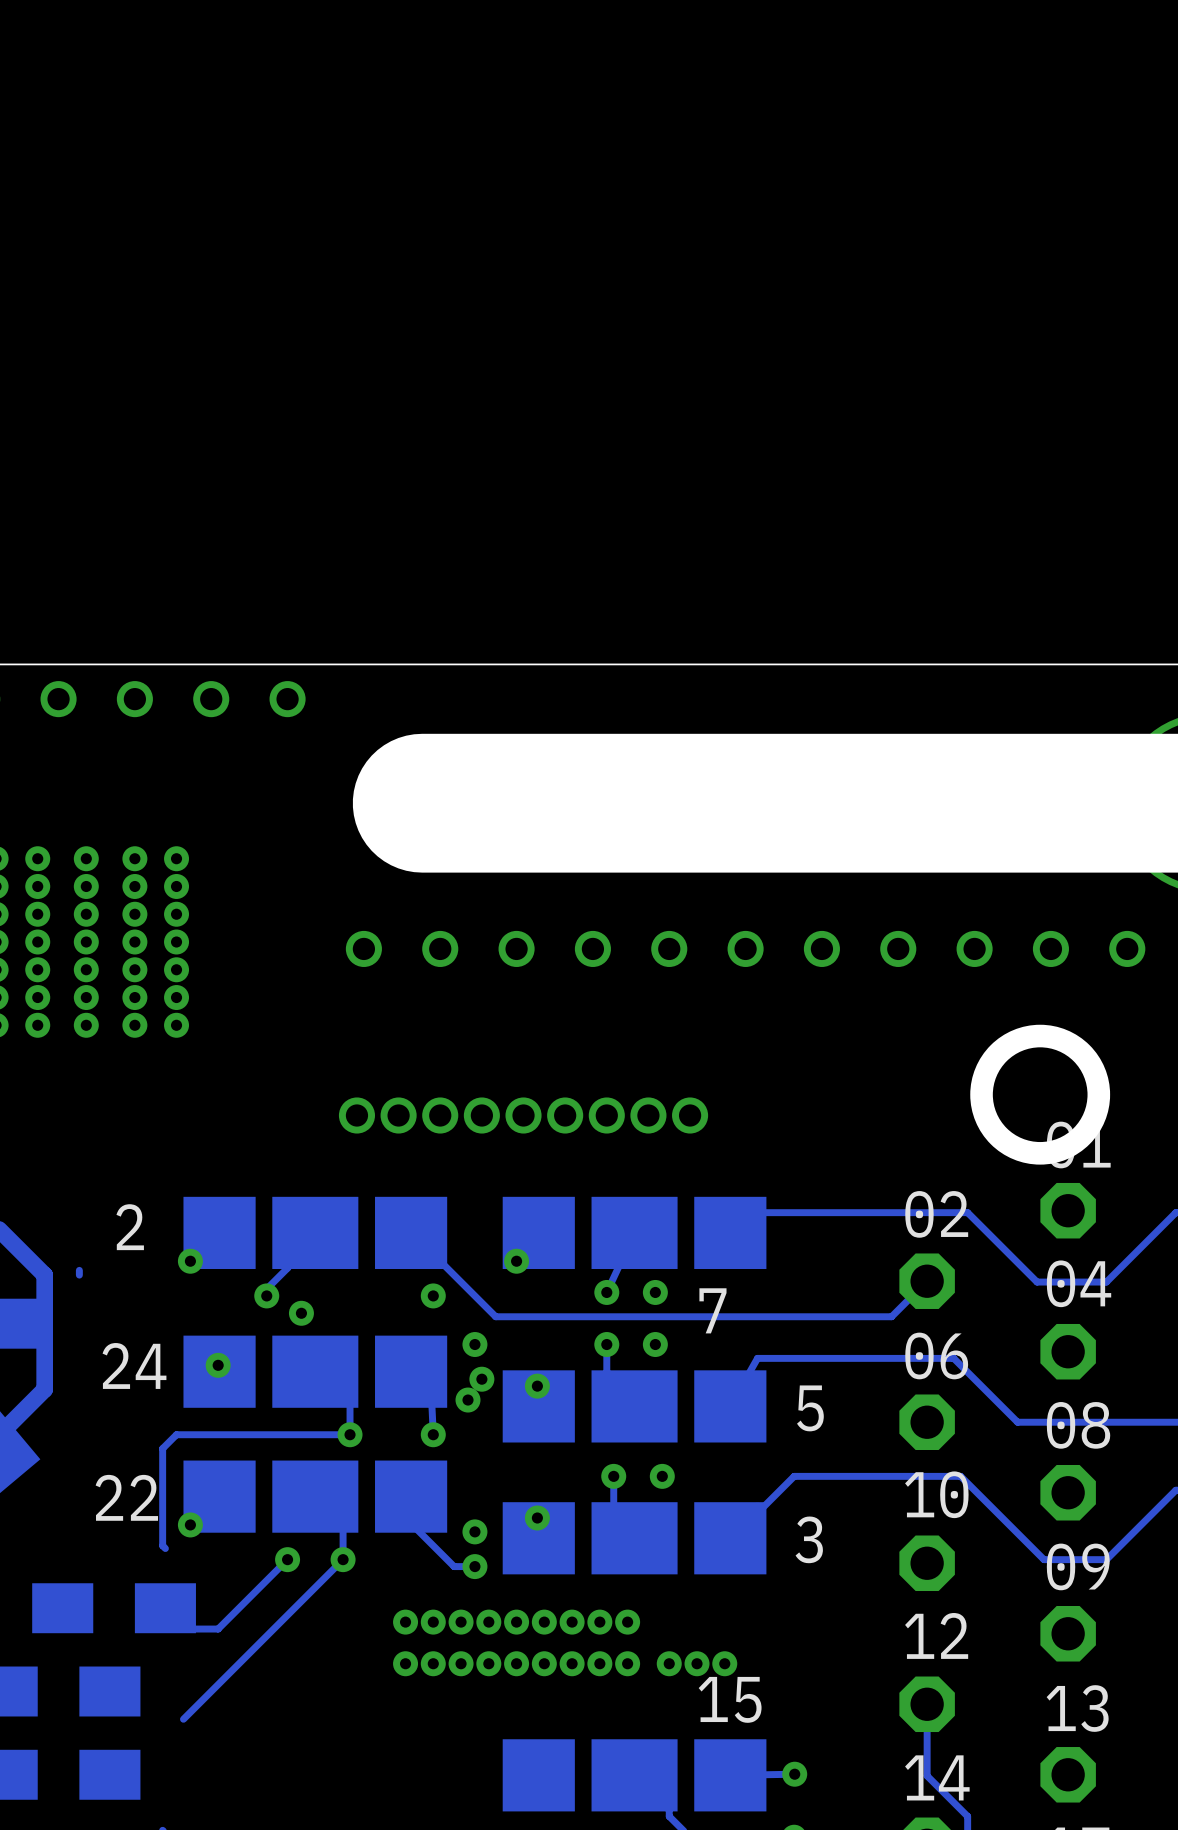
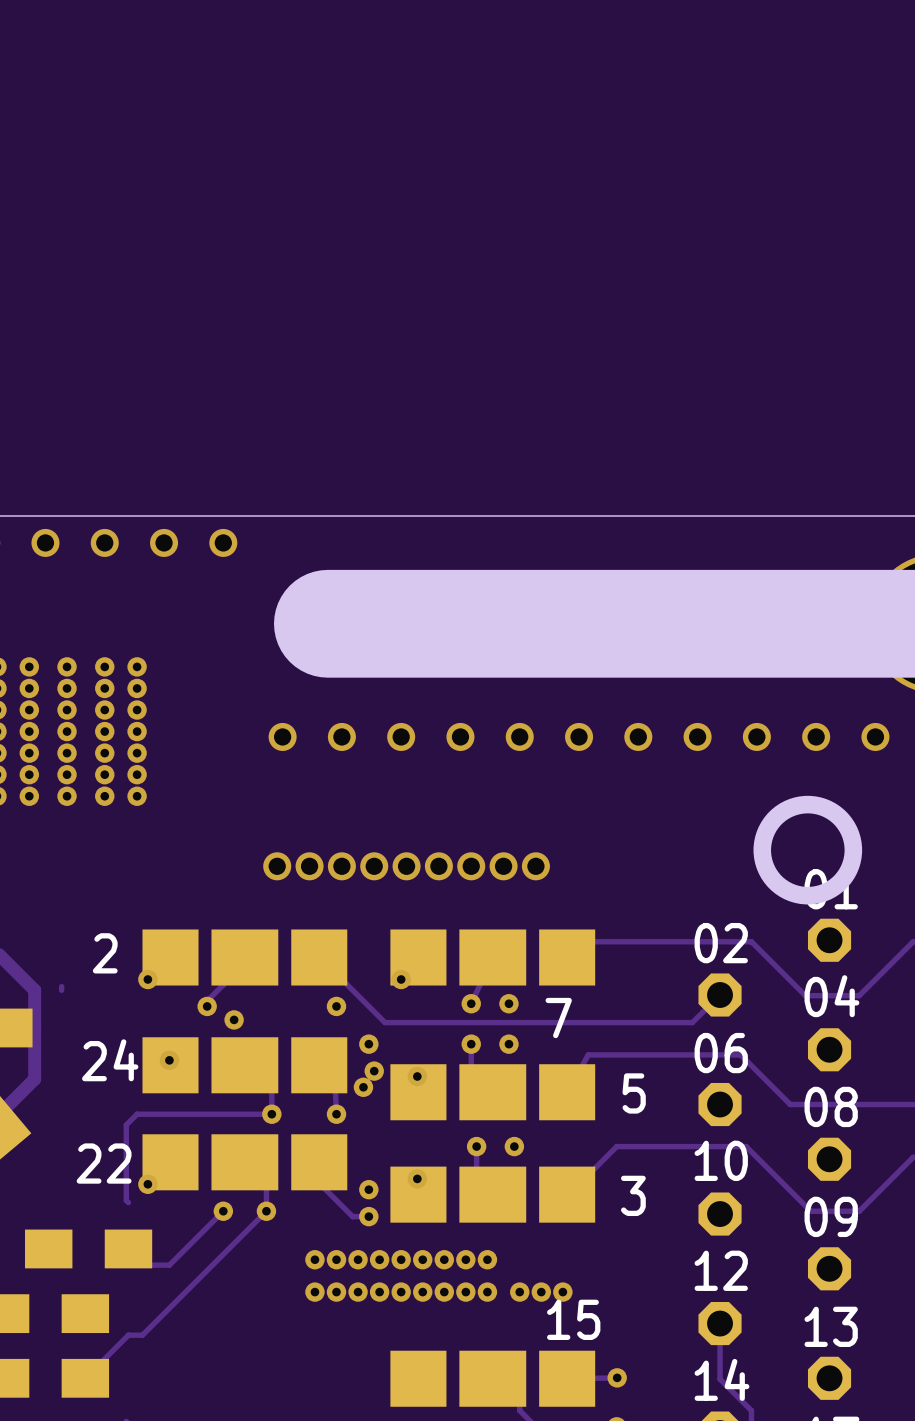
track: none -> (142, 1335) (128, 1335) (85, 1378)

